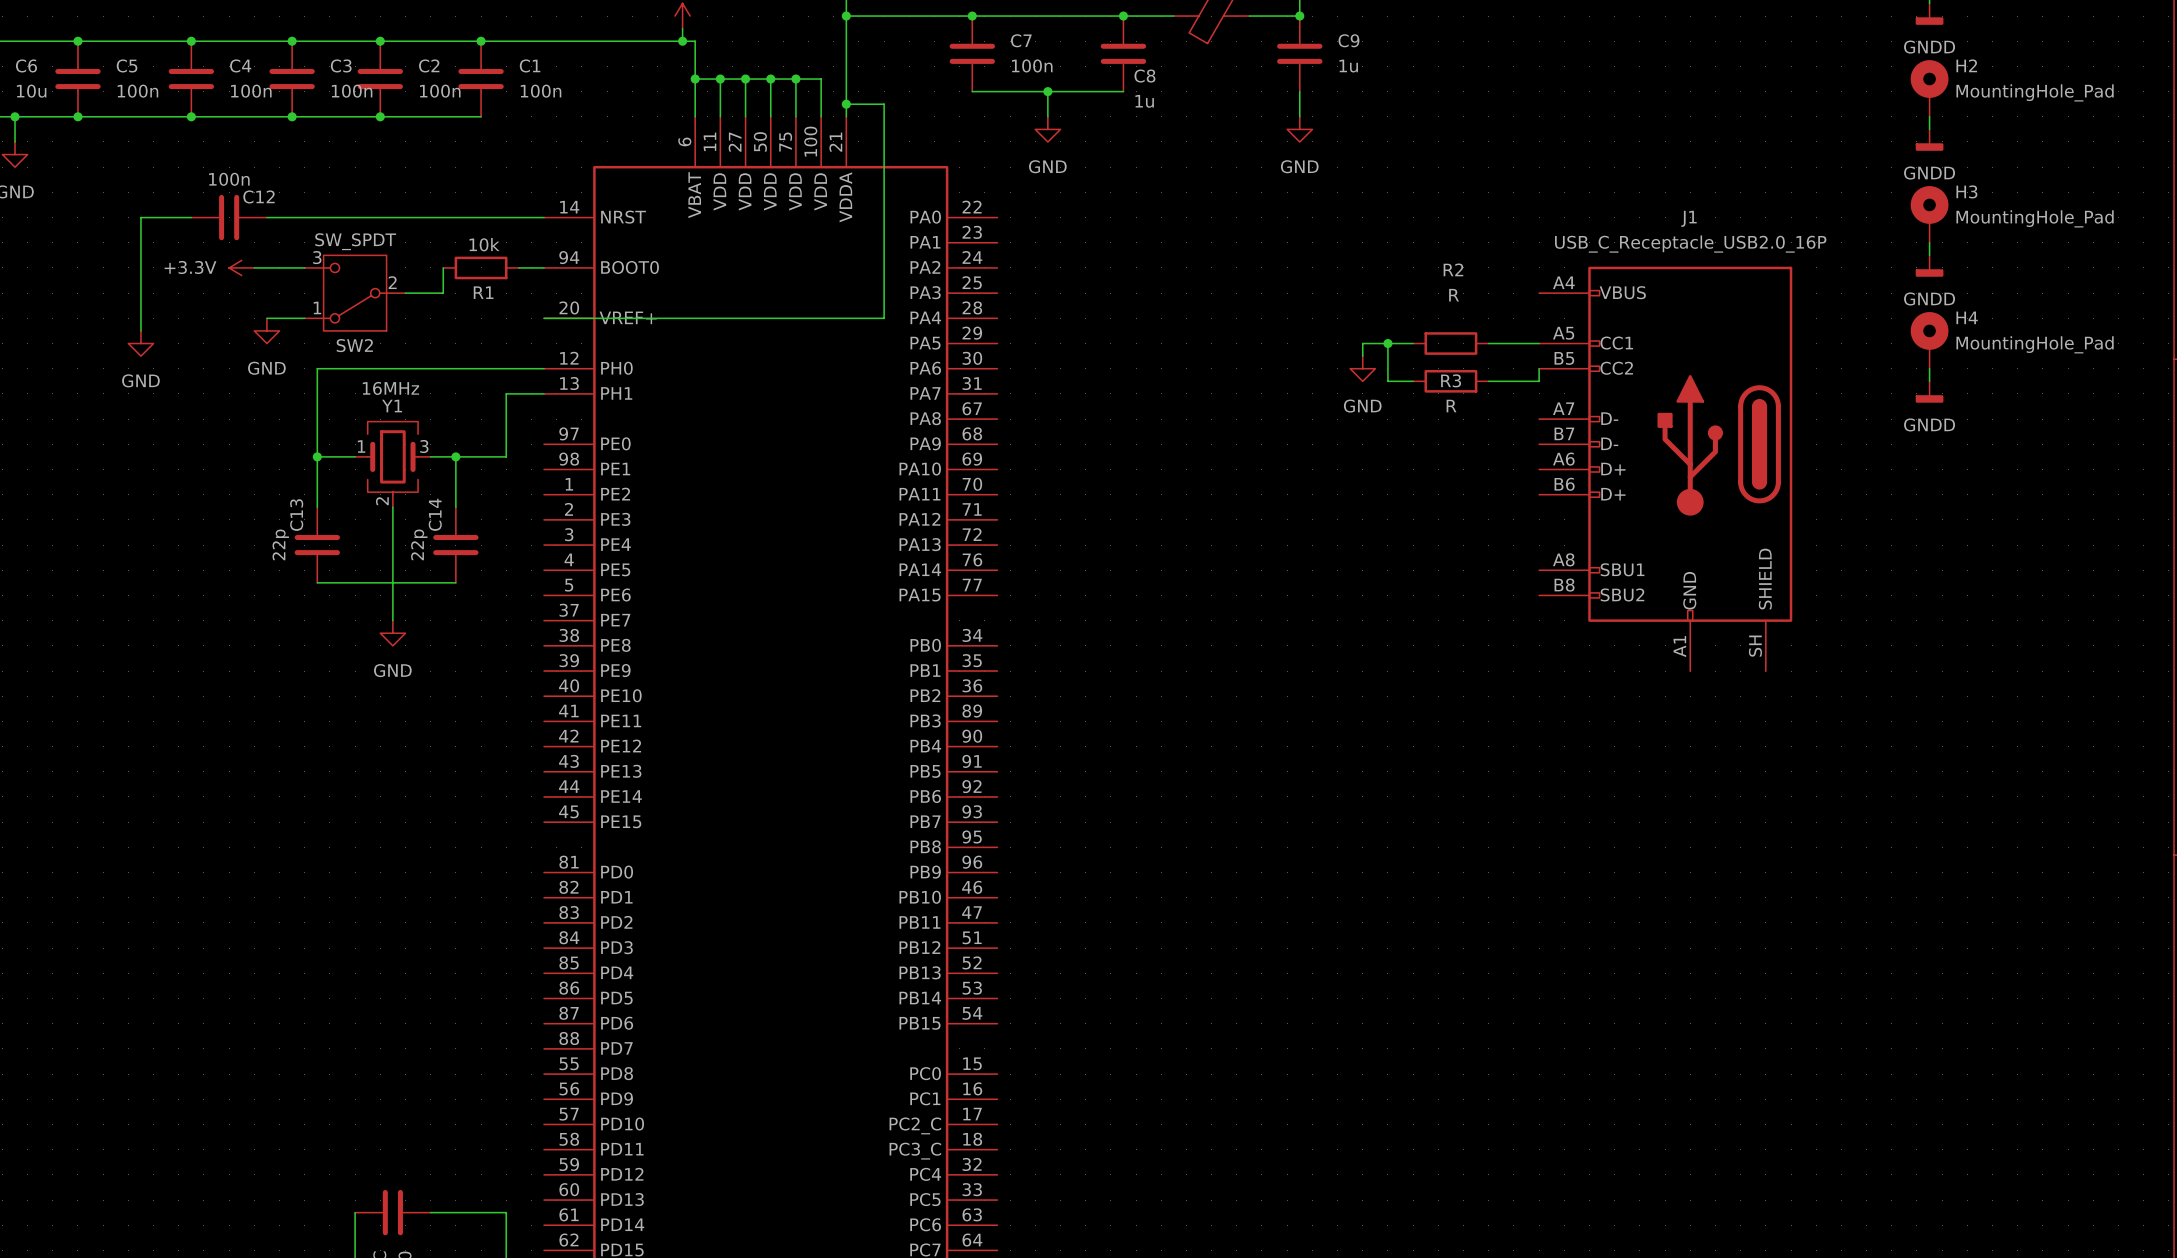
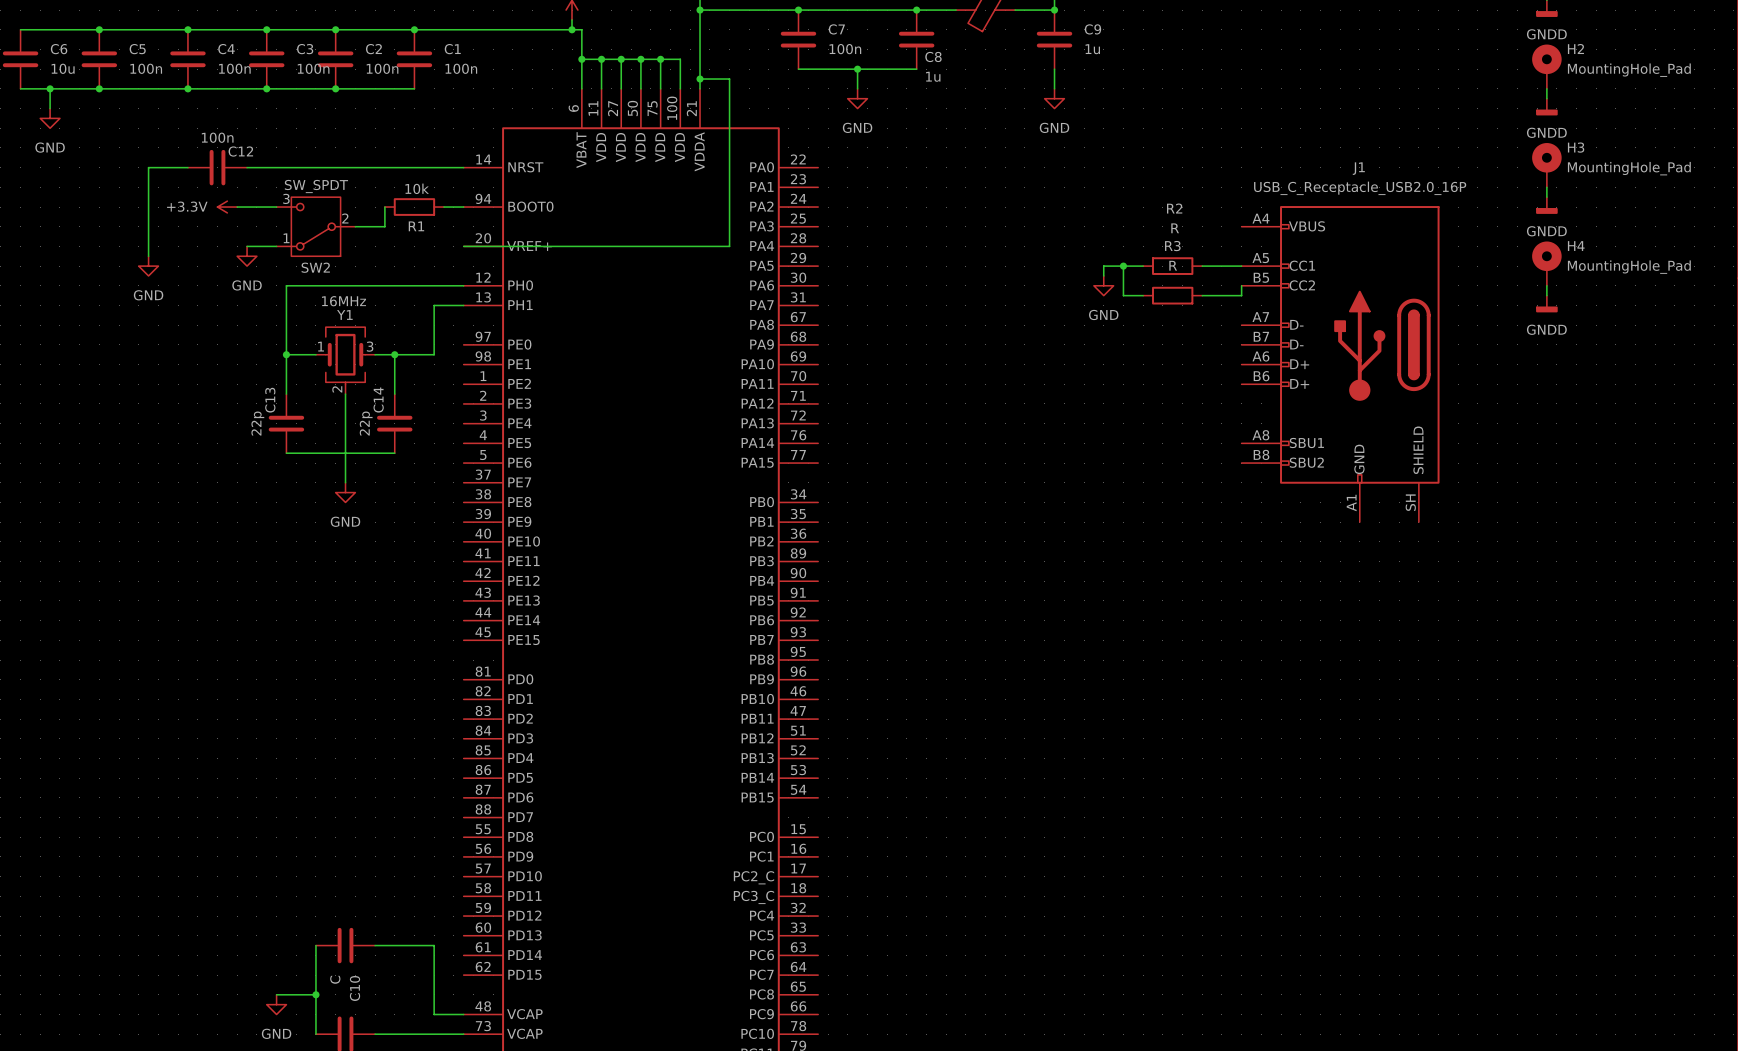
R3 name position: R3 (1451, 380) -> R3 (1172, 246)
R3 value position: R (1451, 406) -> R (1173, 265)

